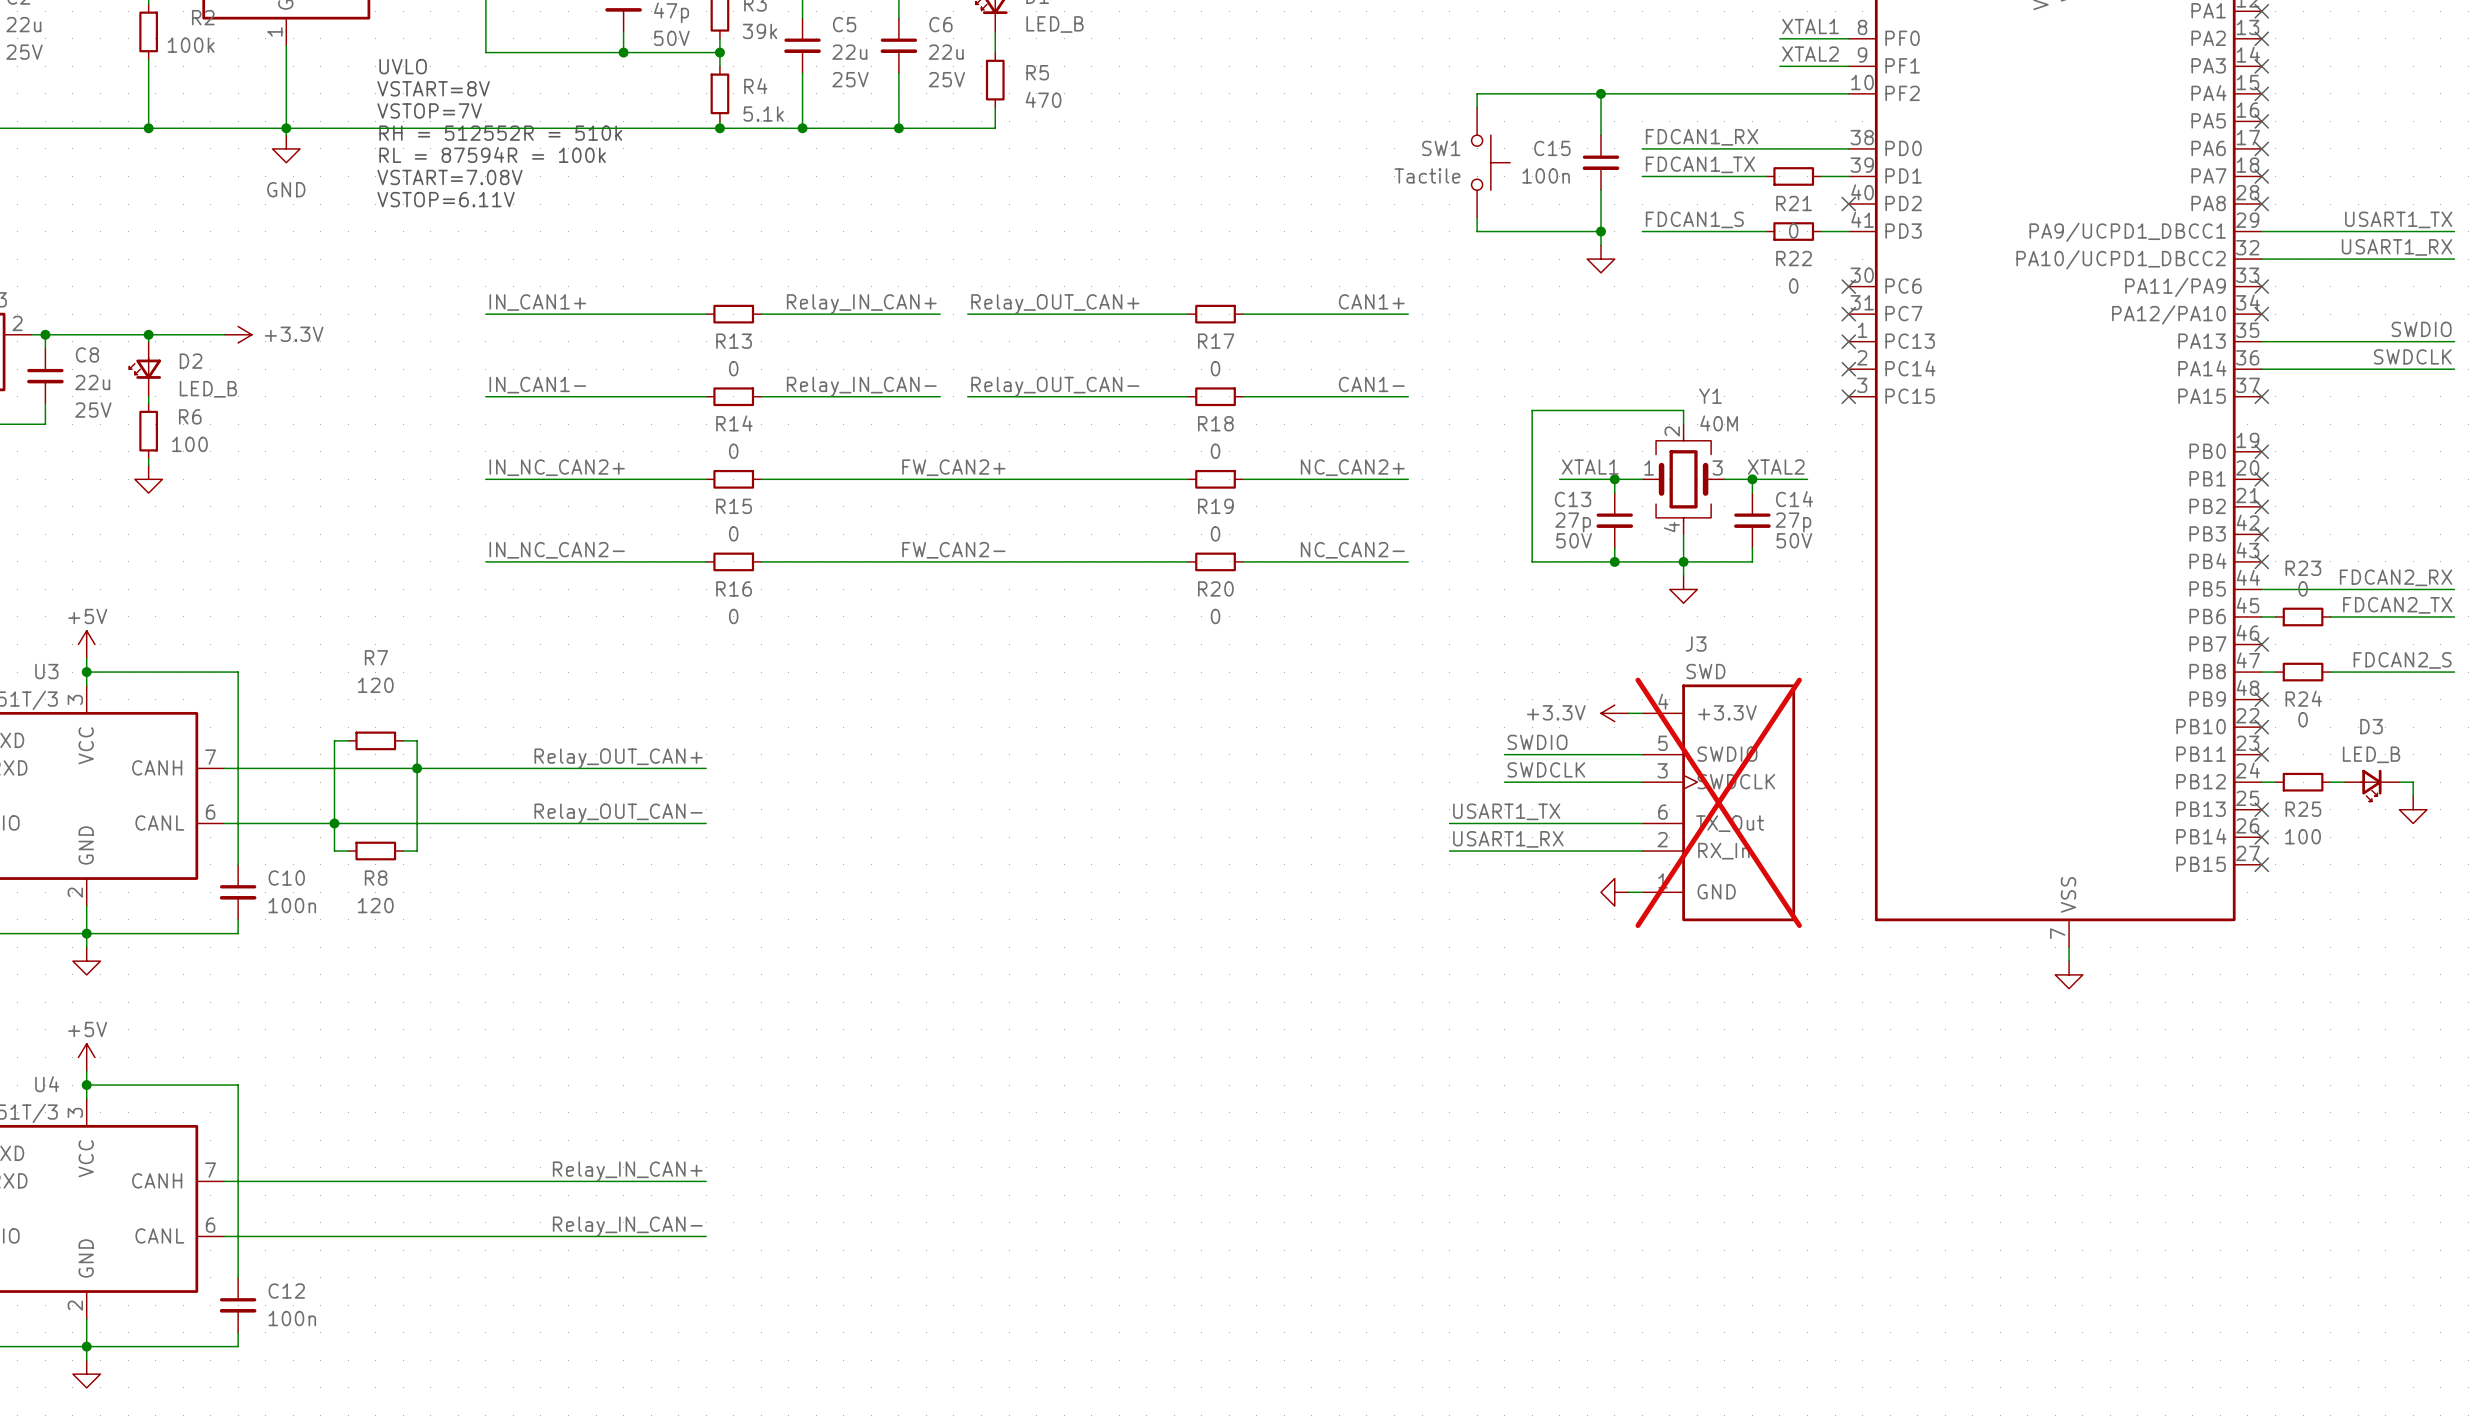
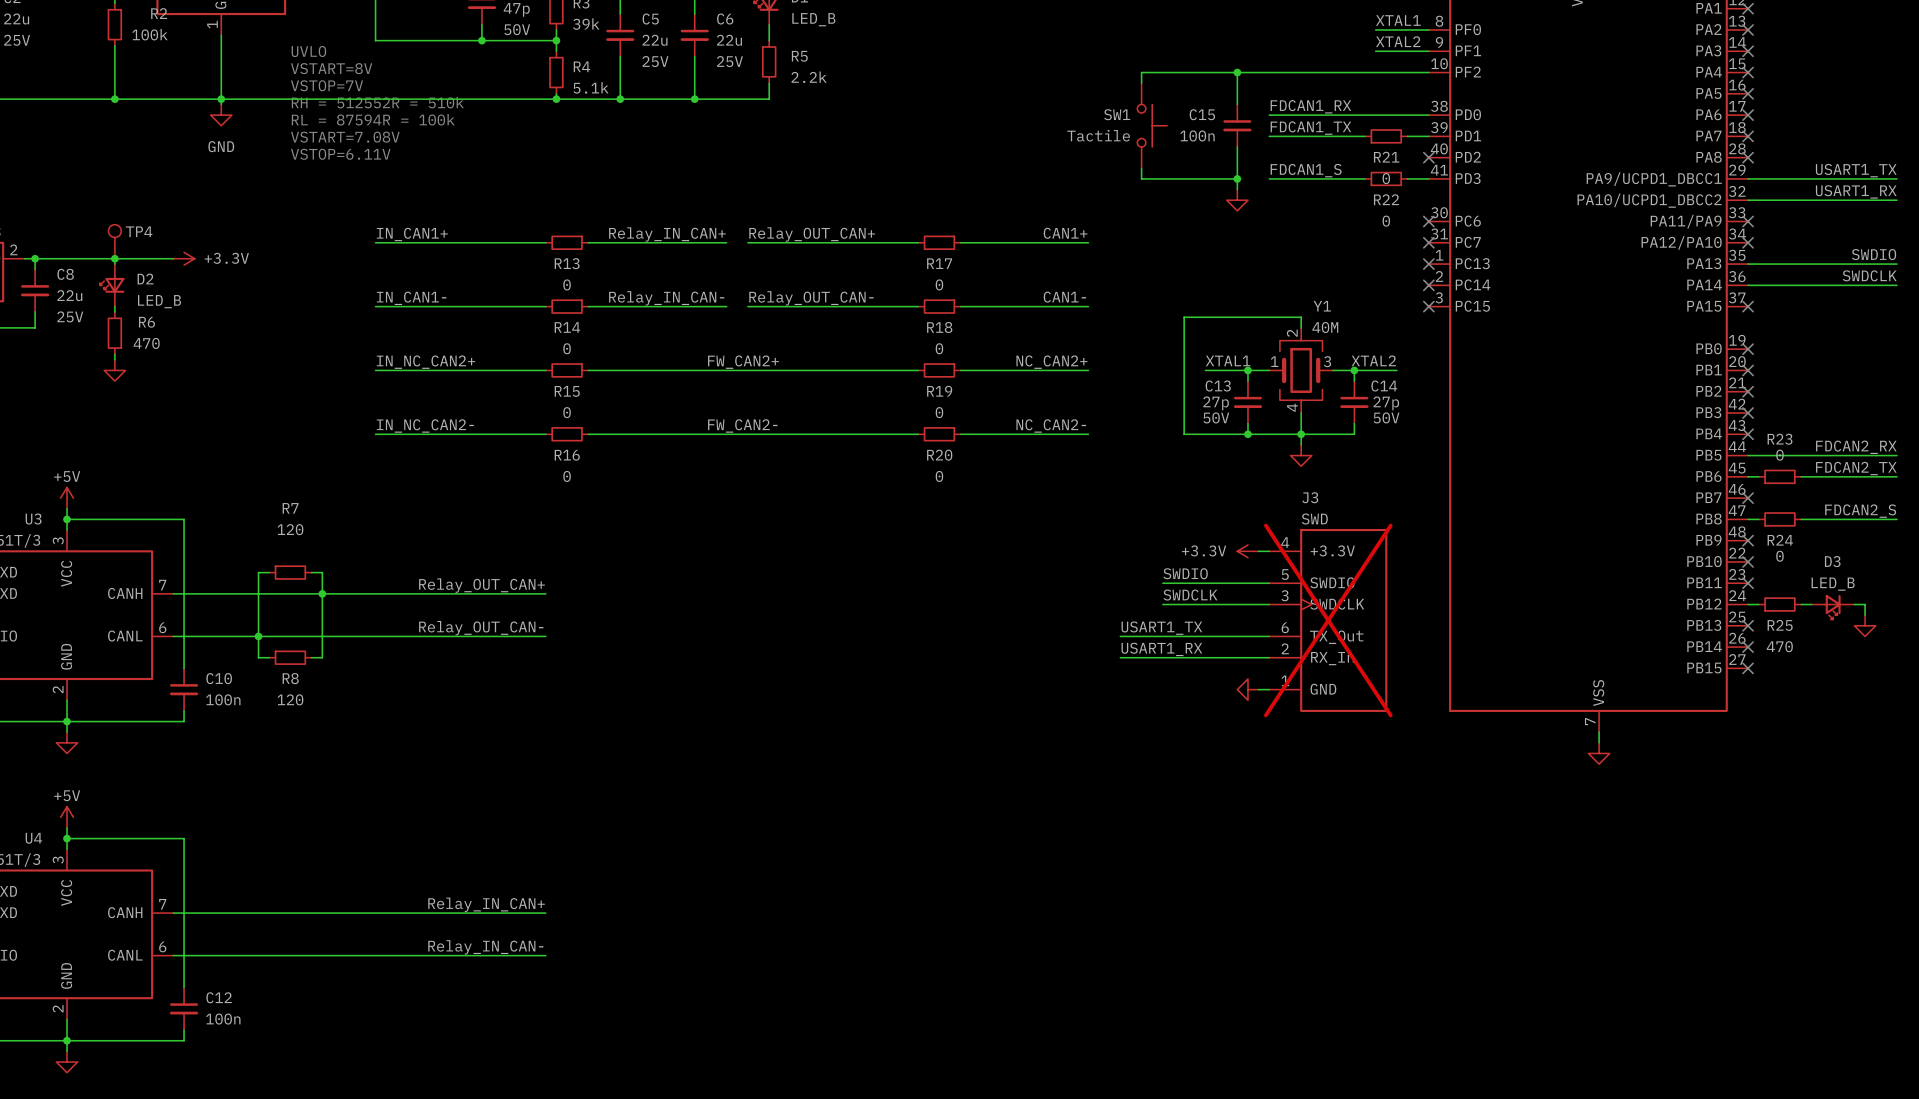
R5 value: 470 (1043, 99) -> 2.2k (809, 77)
TP4: none -> (114, 241)
R6 value: 100 (189, 444) -> 470 (146, 343)
R25 value: 100 (2303, 836) -> 470 (1779, 646)

